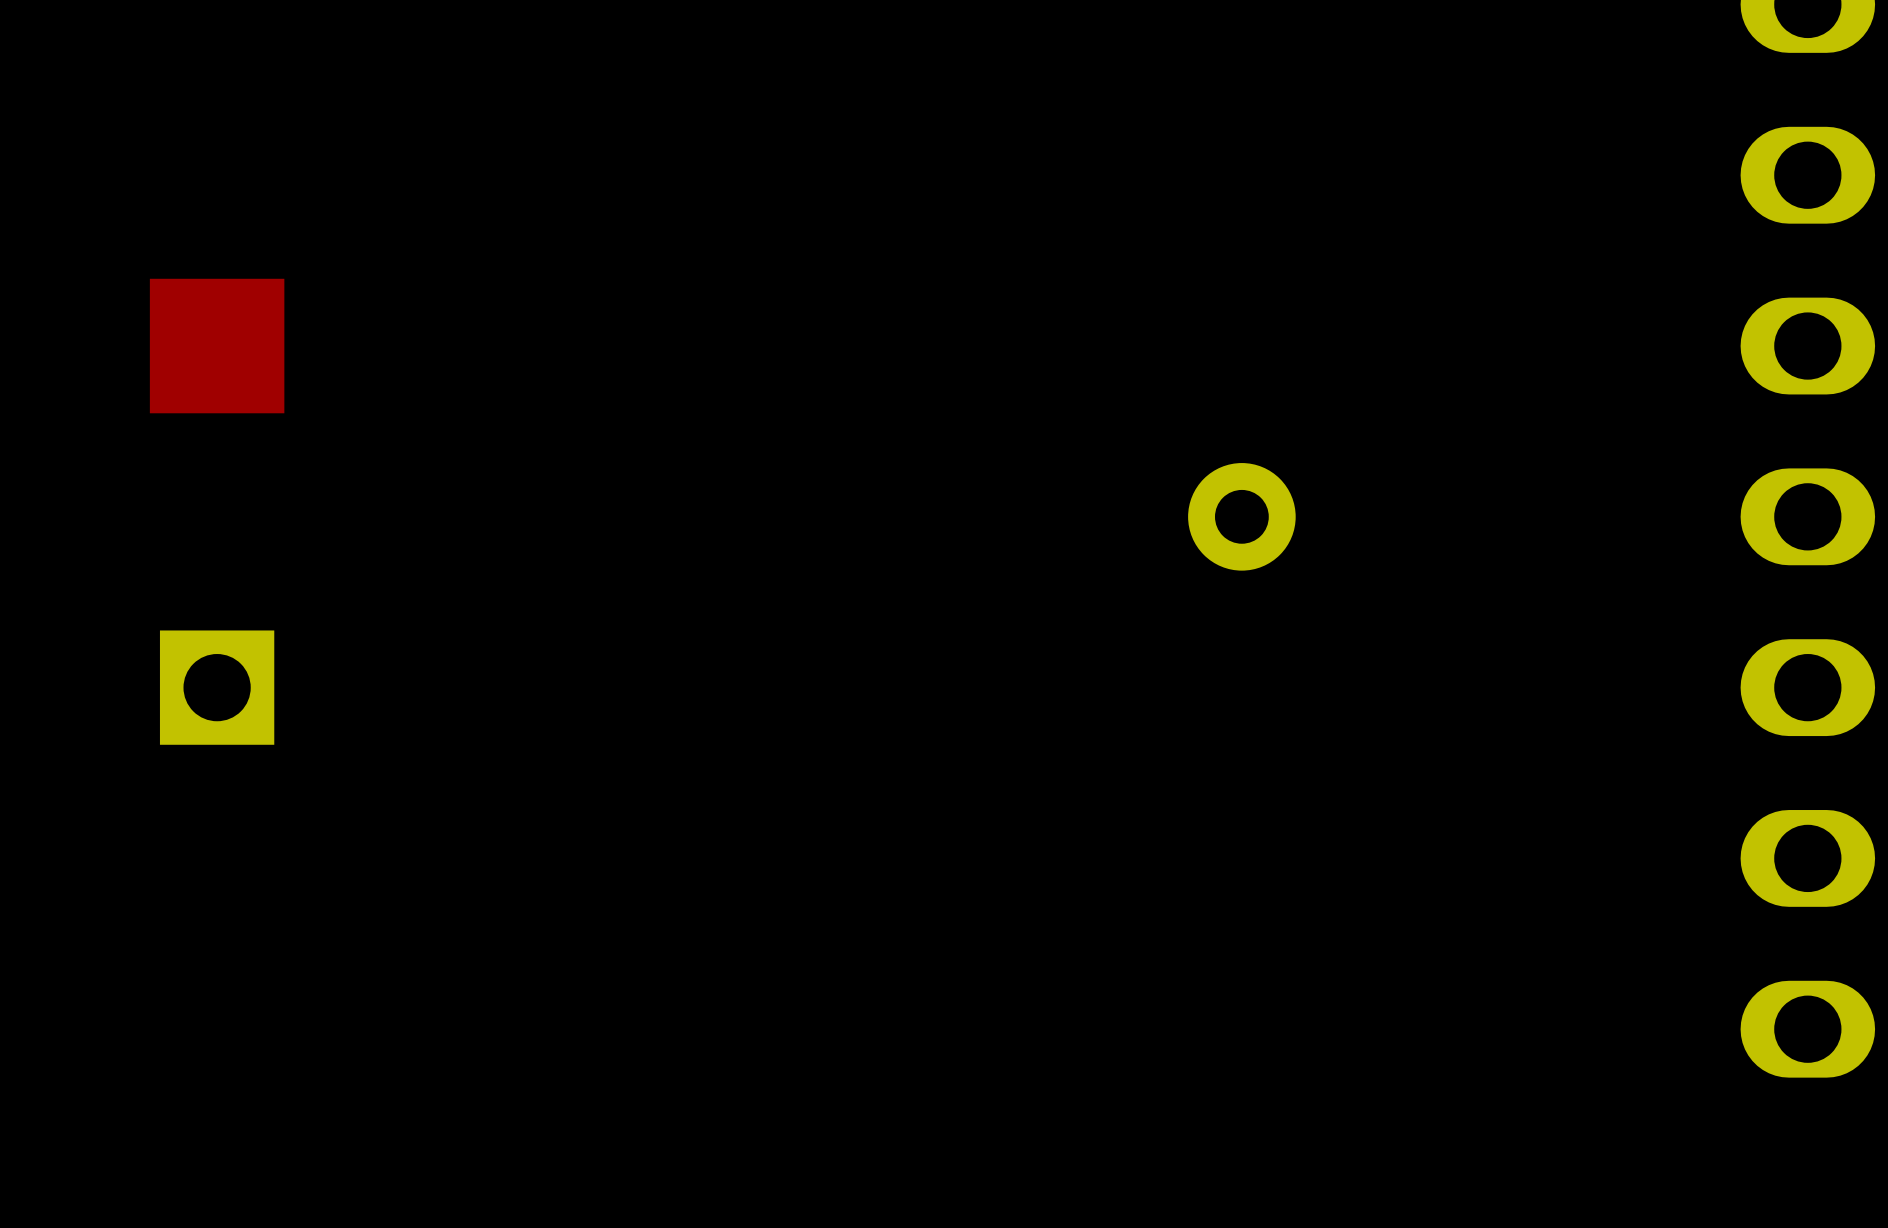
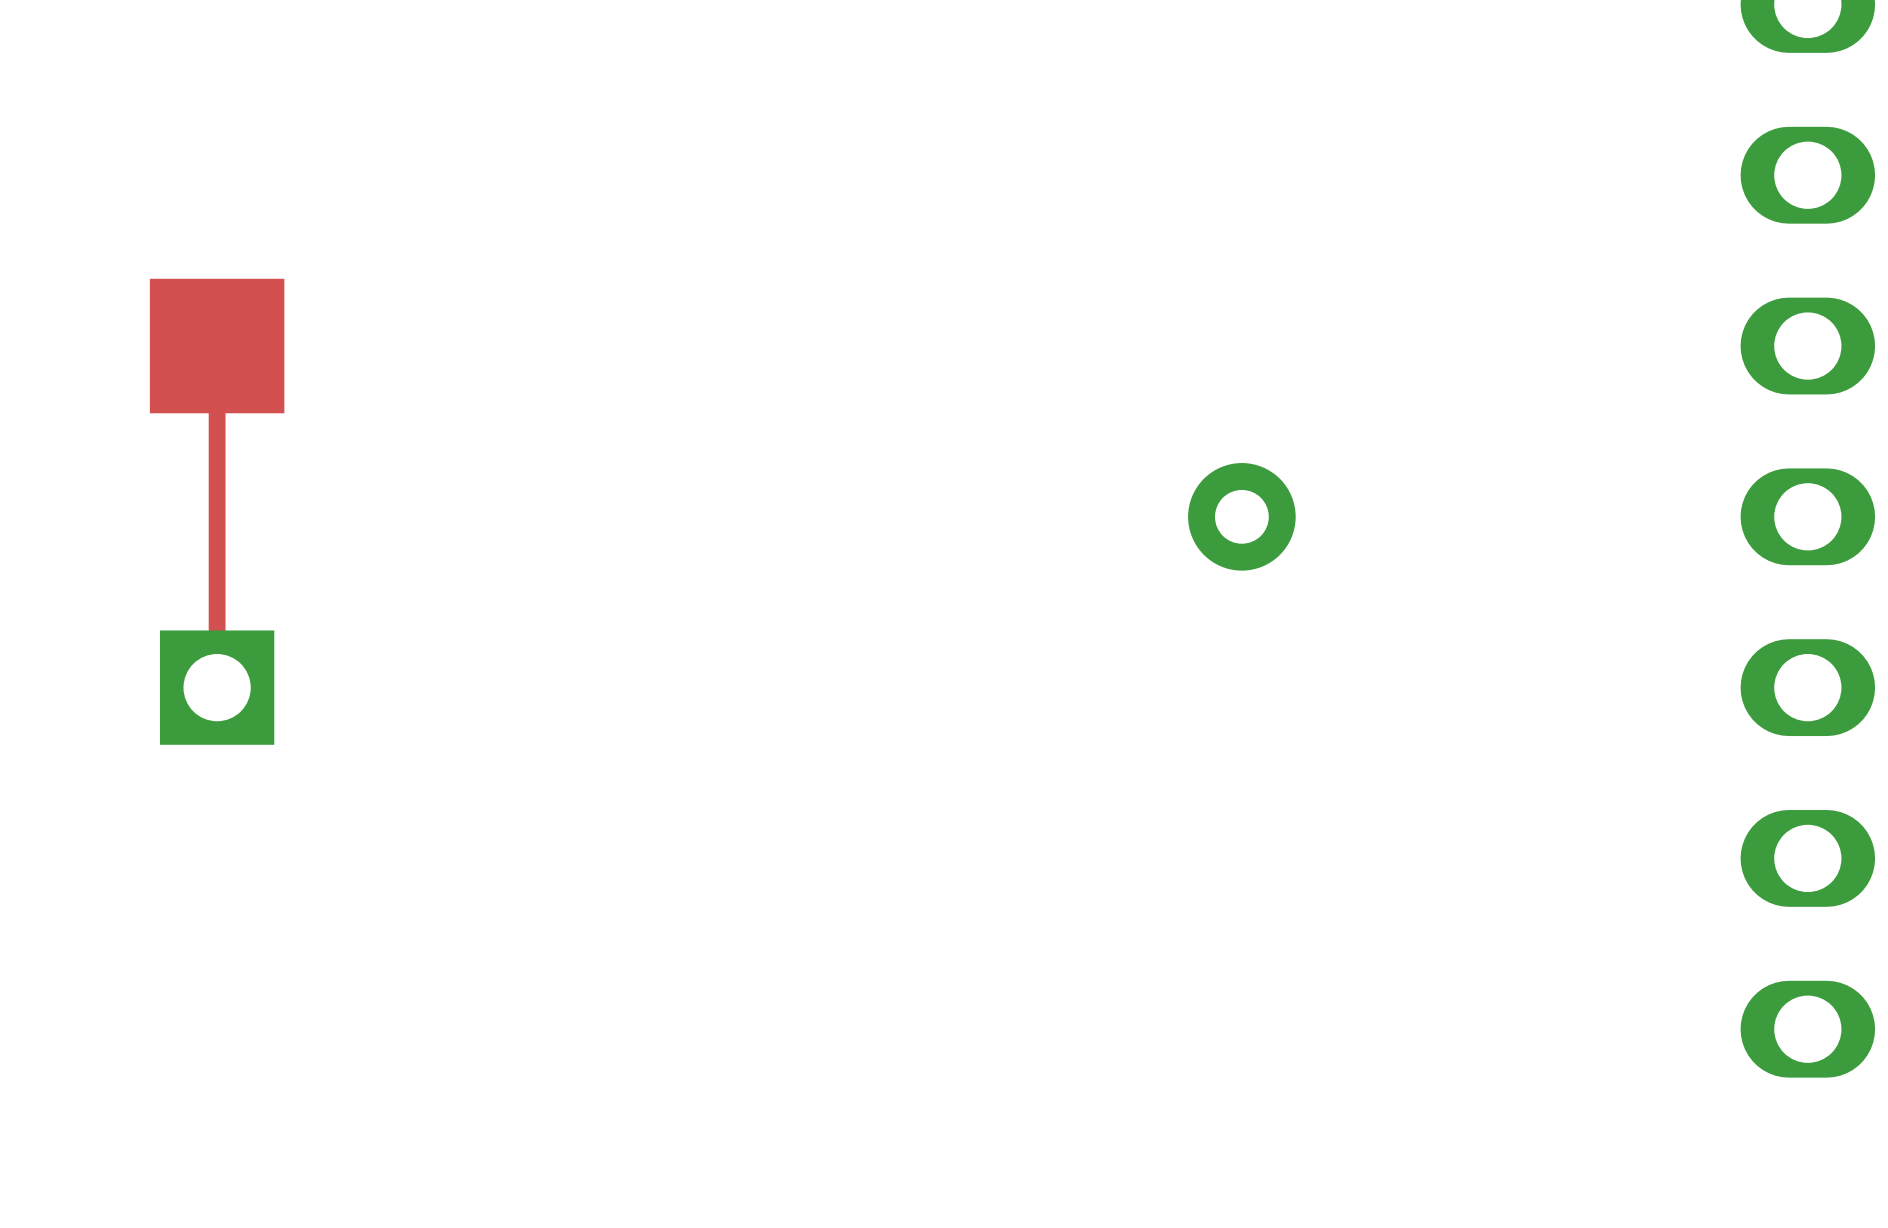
top track: none -> (217, 346) (217, 687)

